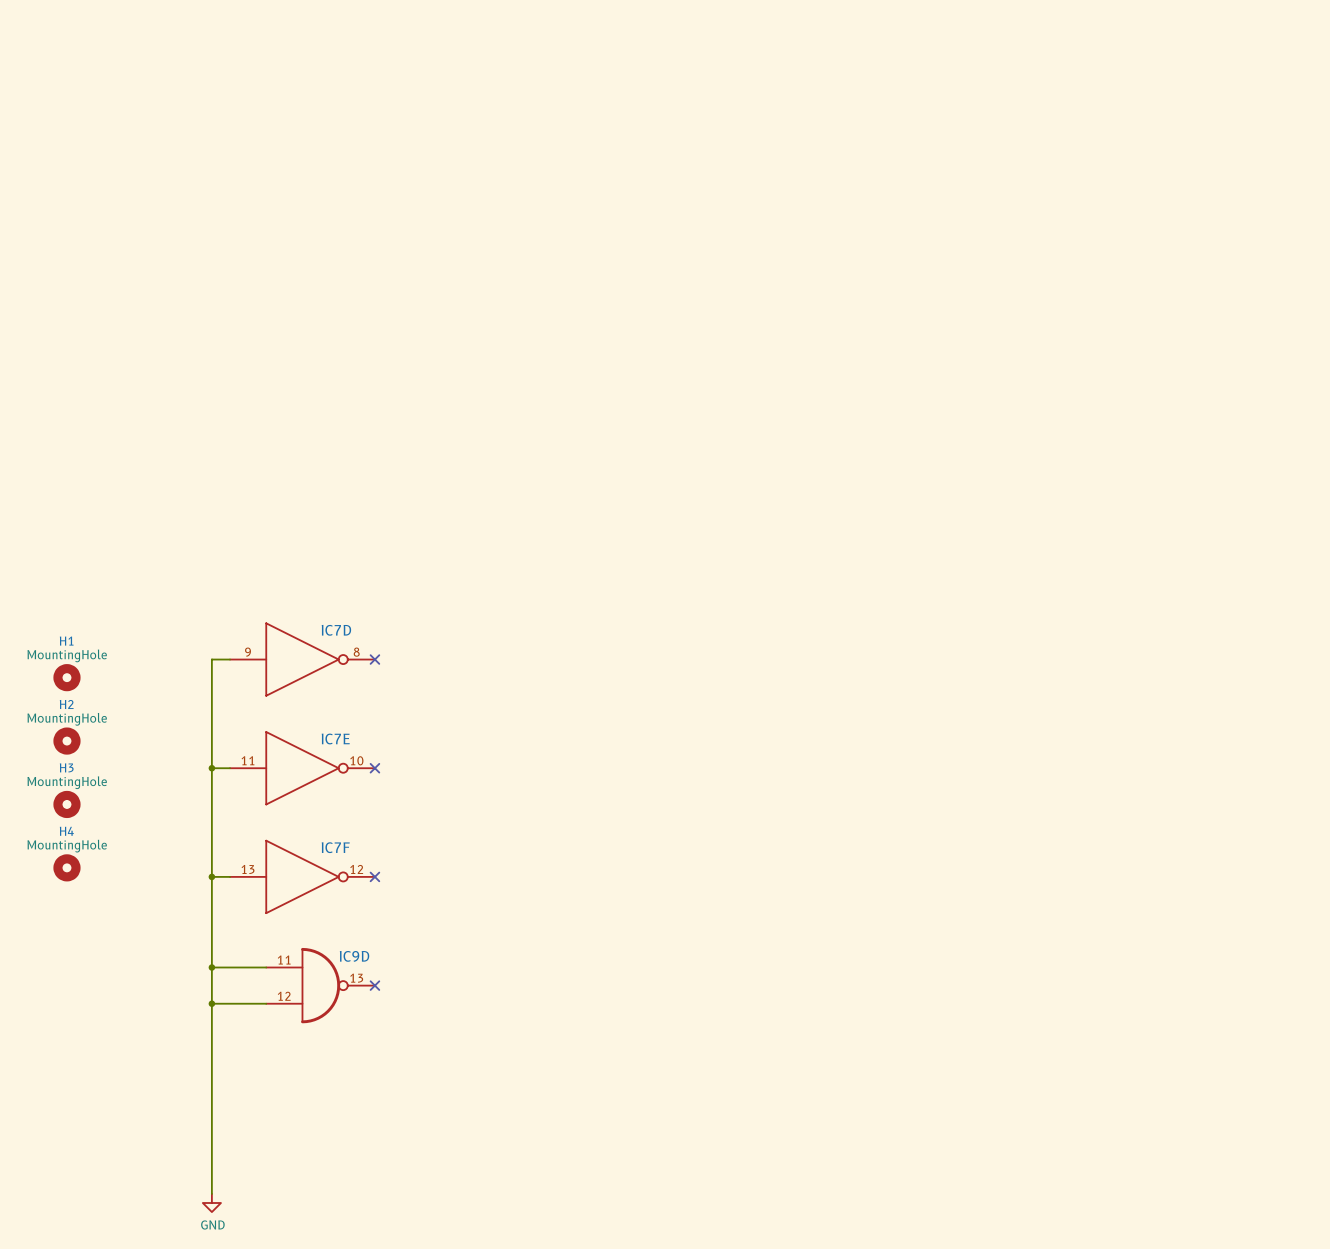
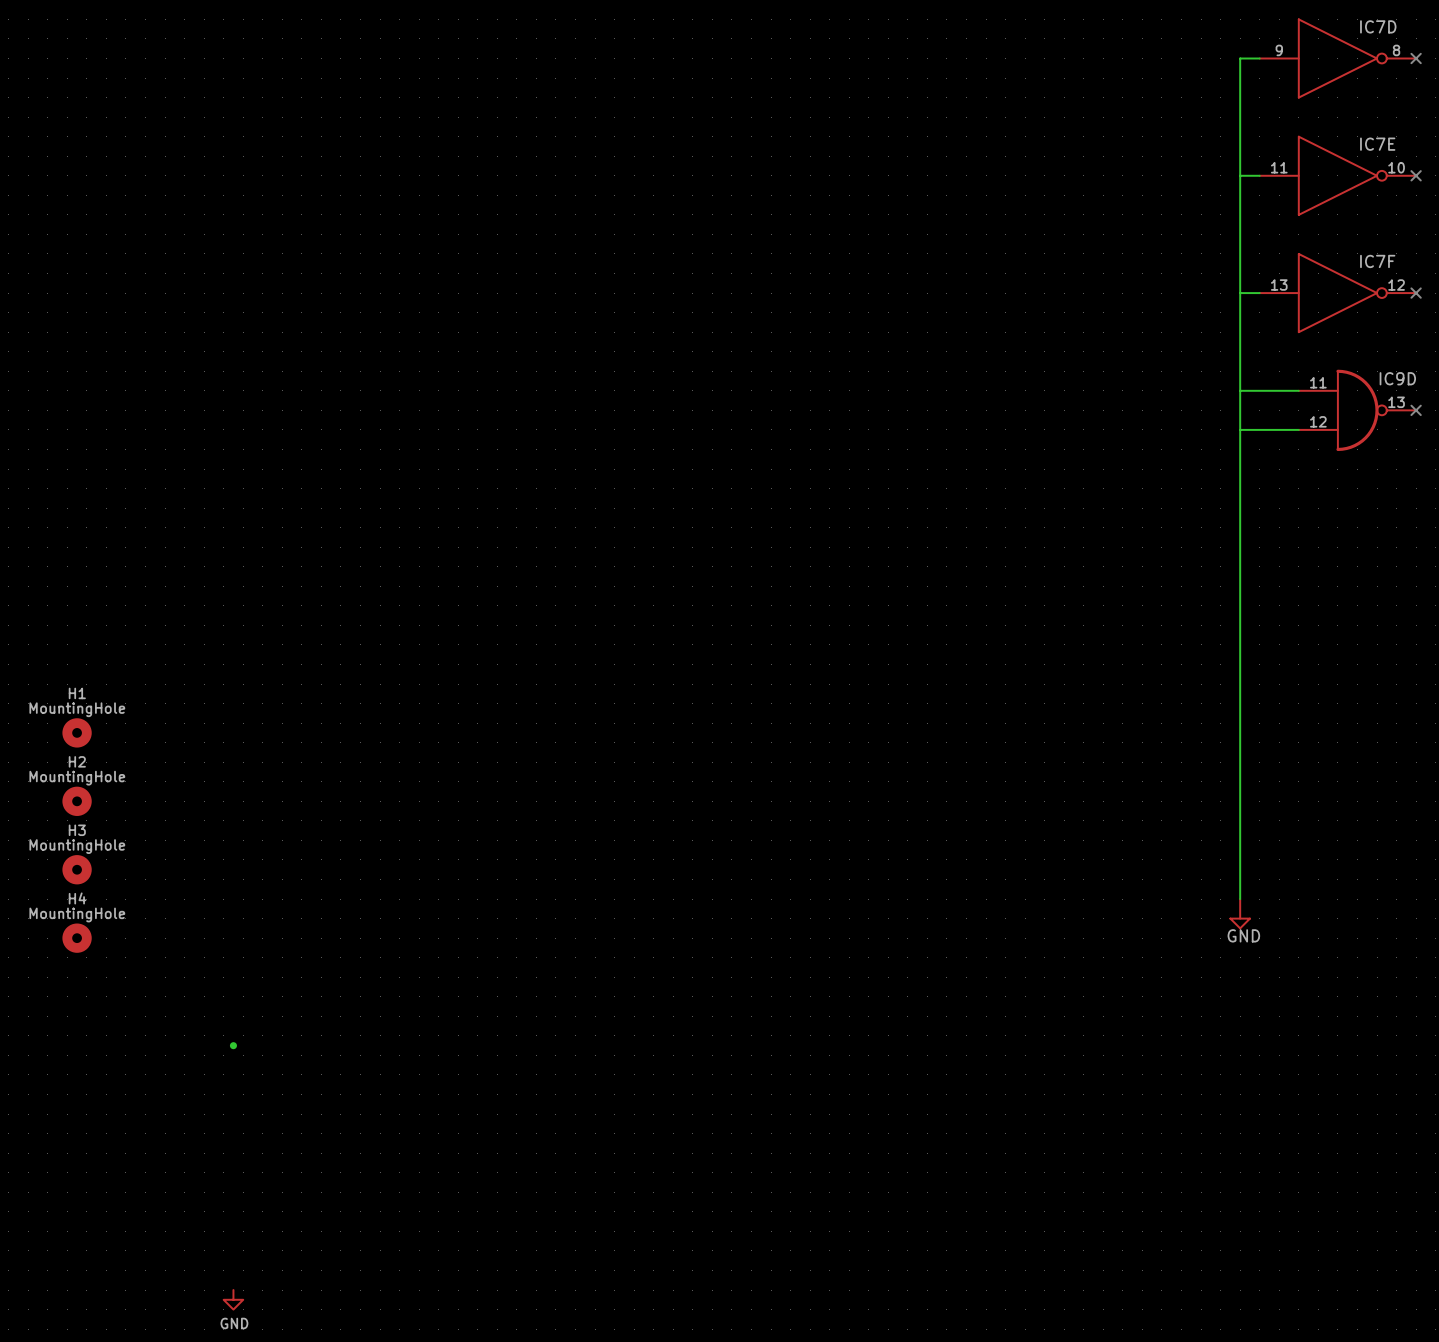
wire: none -> (1259, 58) (1240, 58) (1240, 899)
no-connect mark: none -> (1416, 58)
wire: none -> (1240, 175) (1259, 175)
no-connect mark: none -> (1416, 175)
wire: none -> (1240, 293) (1259, 293)
no-connect mark: none -> (1416, 293)
wire: none -> (1240, 390) (1298, 390)
no-connect mark: none -> (1416, 410)
wire: none -> (1240, 429) (1298, 429)
wire: (230, 659) (211, 659) (211, 1193) -> none
IC7D position: (302, 659) -> (1337, 58)
no-connect mark: (374, 659) -> none
wire: (211, 768) (230, 768) -> none
junction: (211, 768) -> none
IC7E position: (302, 768) -> (1337, 175)
no-connect mark: (374, 768) -> none
power symbol: none -> GND (1240, 913)
wire: (211, 876) (230, 876) -> none
junction: (211, 876) -> none
IC7F position: (302, 876) -> (1337, 293)
no-connect mark: (374, 876) -> none
wire: (211, 967) (266, 967) -> none
IC9D position: (320, 985) -> (1357, 410)
no-connect mark: (374, 985) -> none
wire: (211, 1003) (266, 1003) -> none
junction: (211, 1003) -> none

